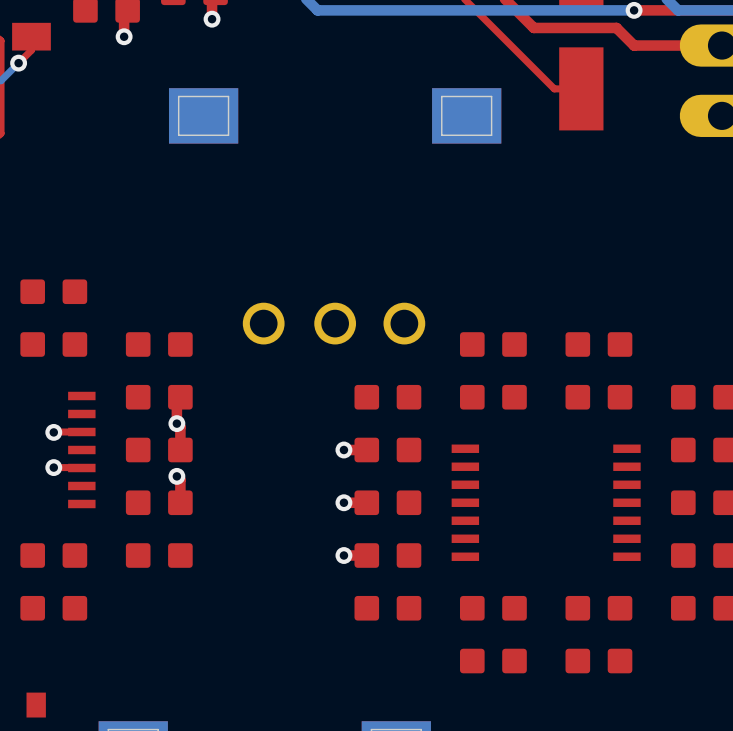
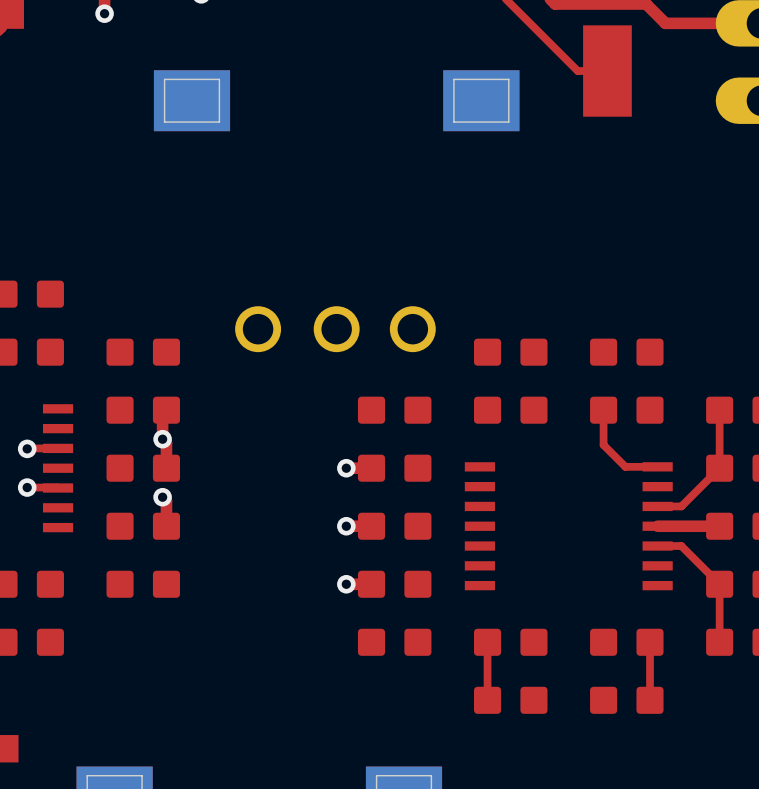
top track: none -> (603, 410) (603, 445) (625, 466) (657, 466)
top track: none -> (719, 410) (719, 468) (681, 506) (657, 506)
top track: none -> (719, 526) (657, 526)
top track: none -> (657, 546) (681, 546) (719, 584) (719, 642)
top track: none -> (487, 642) (487, 700)
top track: none -> (650, 642) (650, 700)

